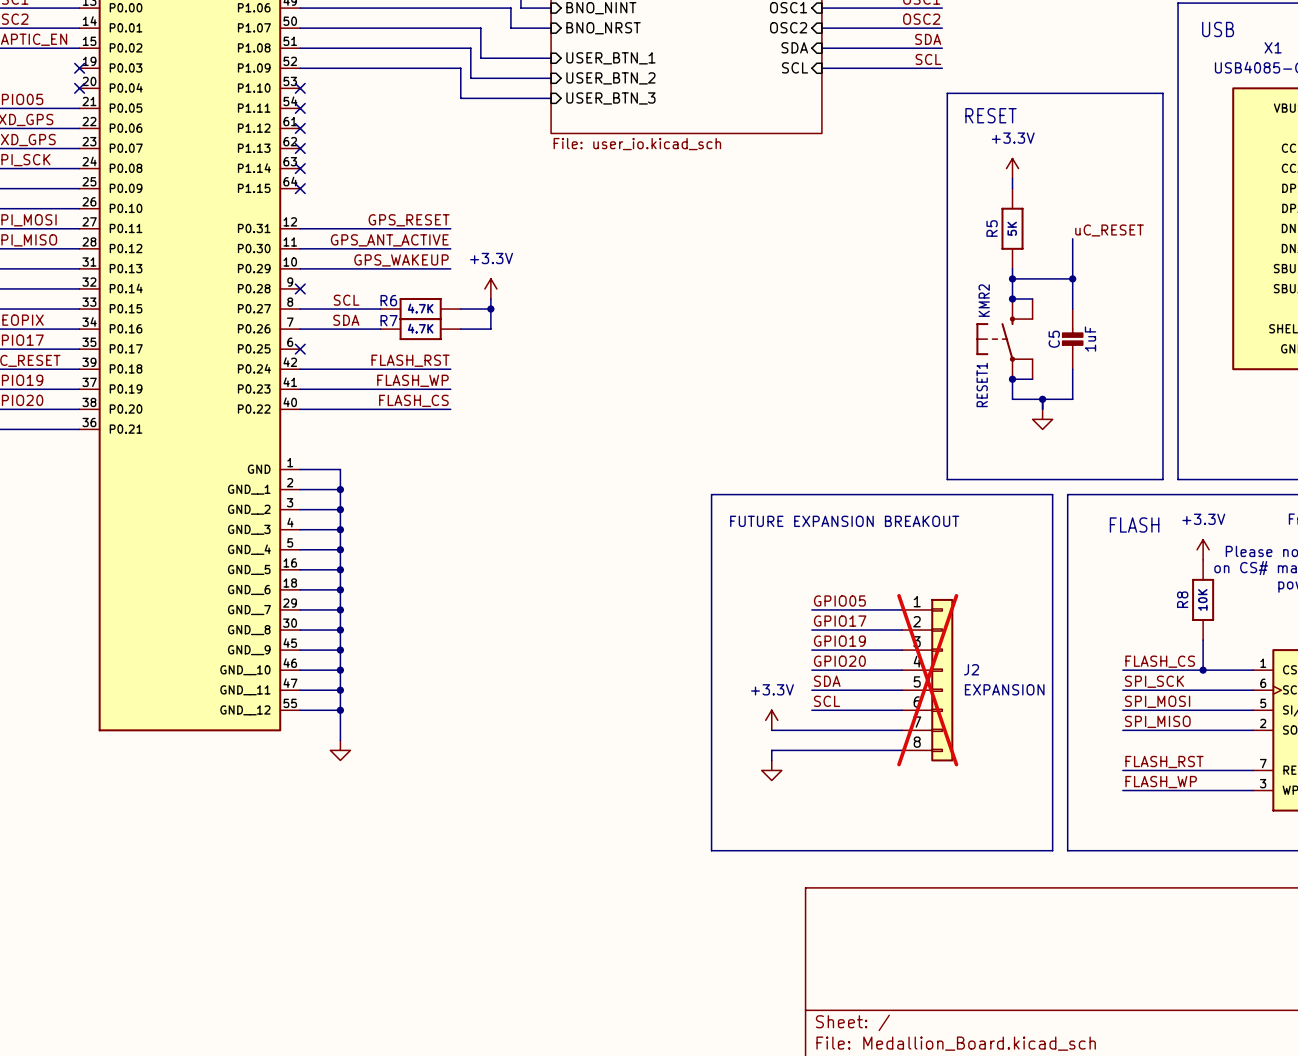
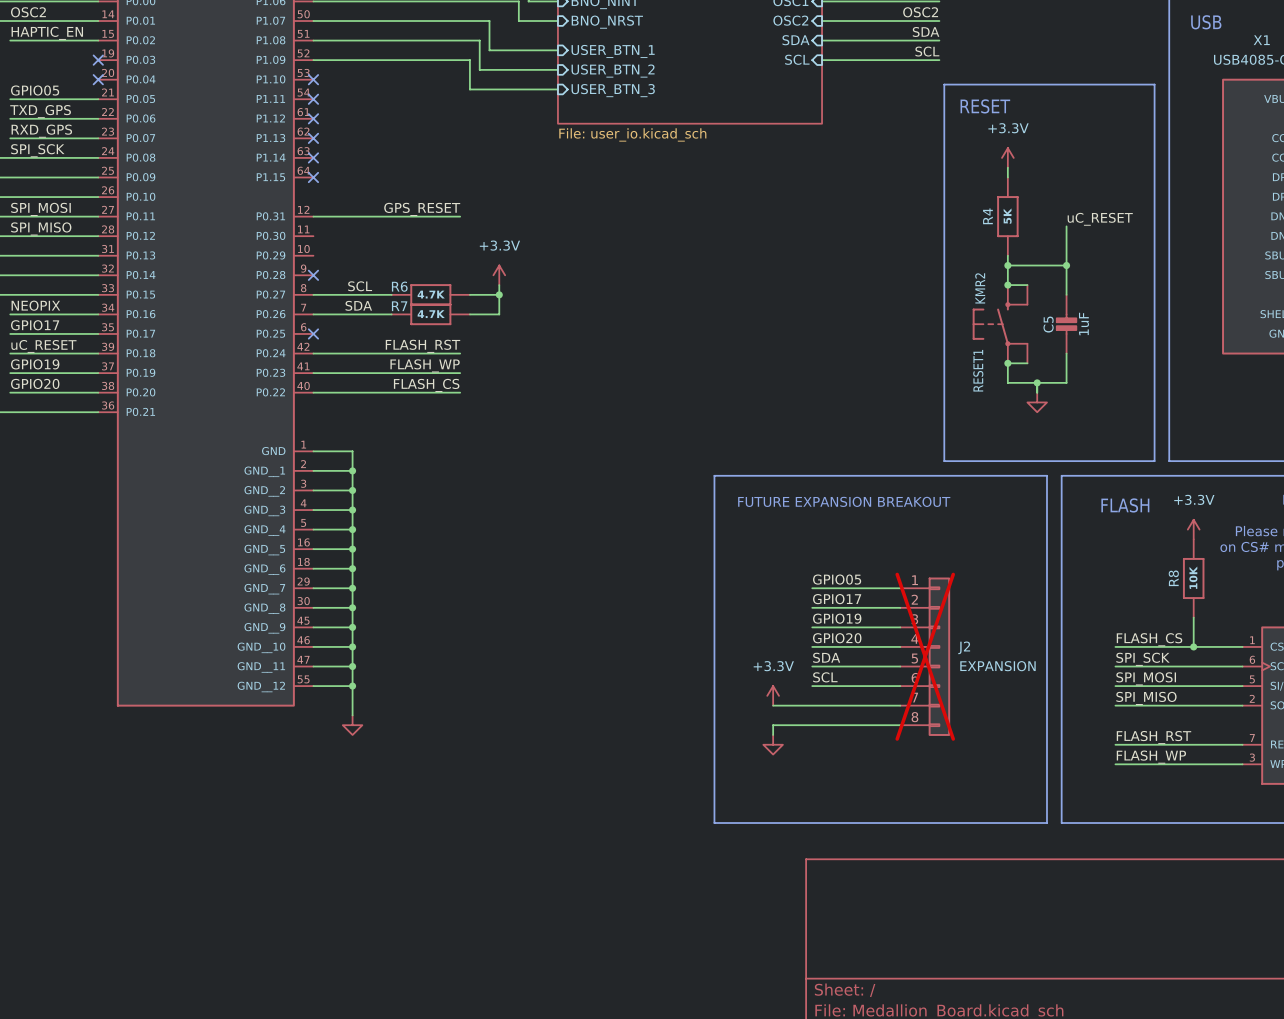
R5 name: R5 (992, 228) -> R4 (987, 216)
label: GPS_ANT_ACTIVE (389, 240) -> none
wire: (300, 248) (450, 248) -> none
label: GPS_WAKEUP (401, 260) -> none
wire: (300, 268) (450, 268) -> none

